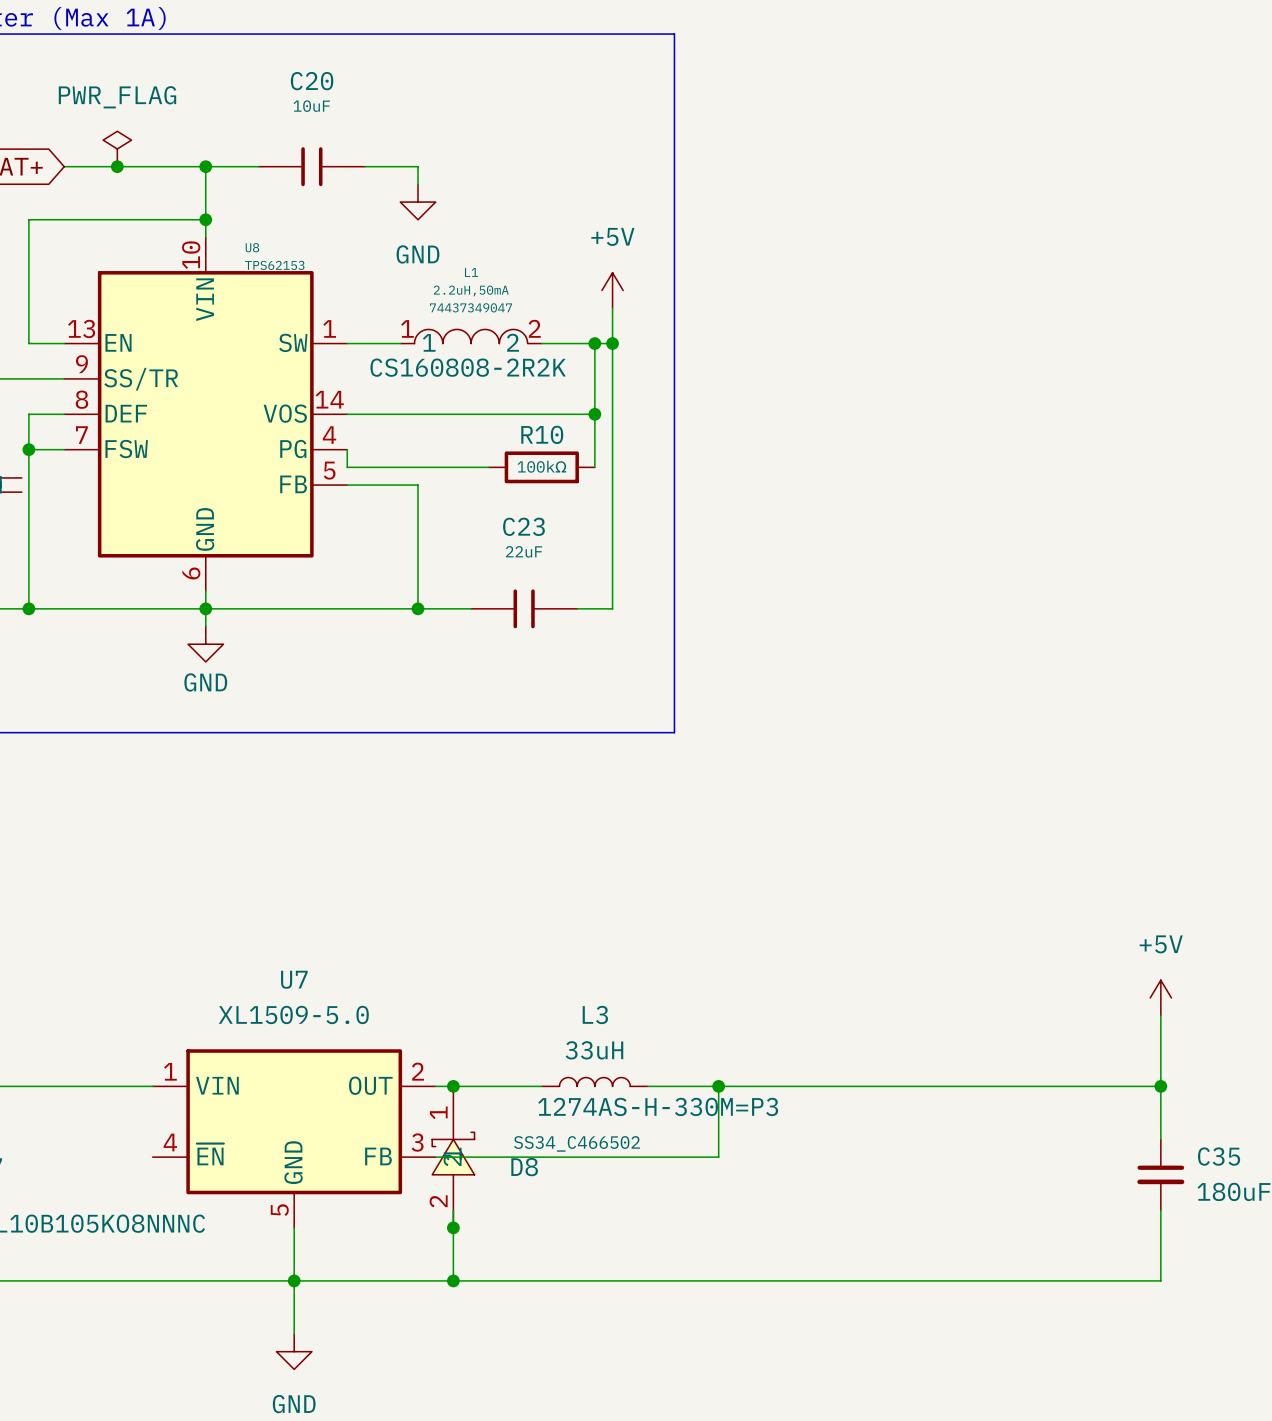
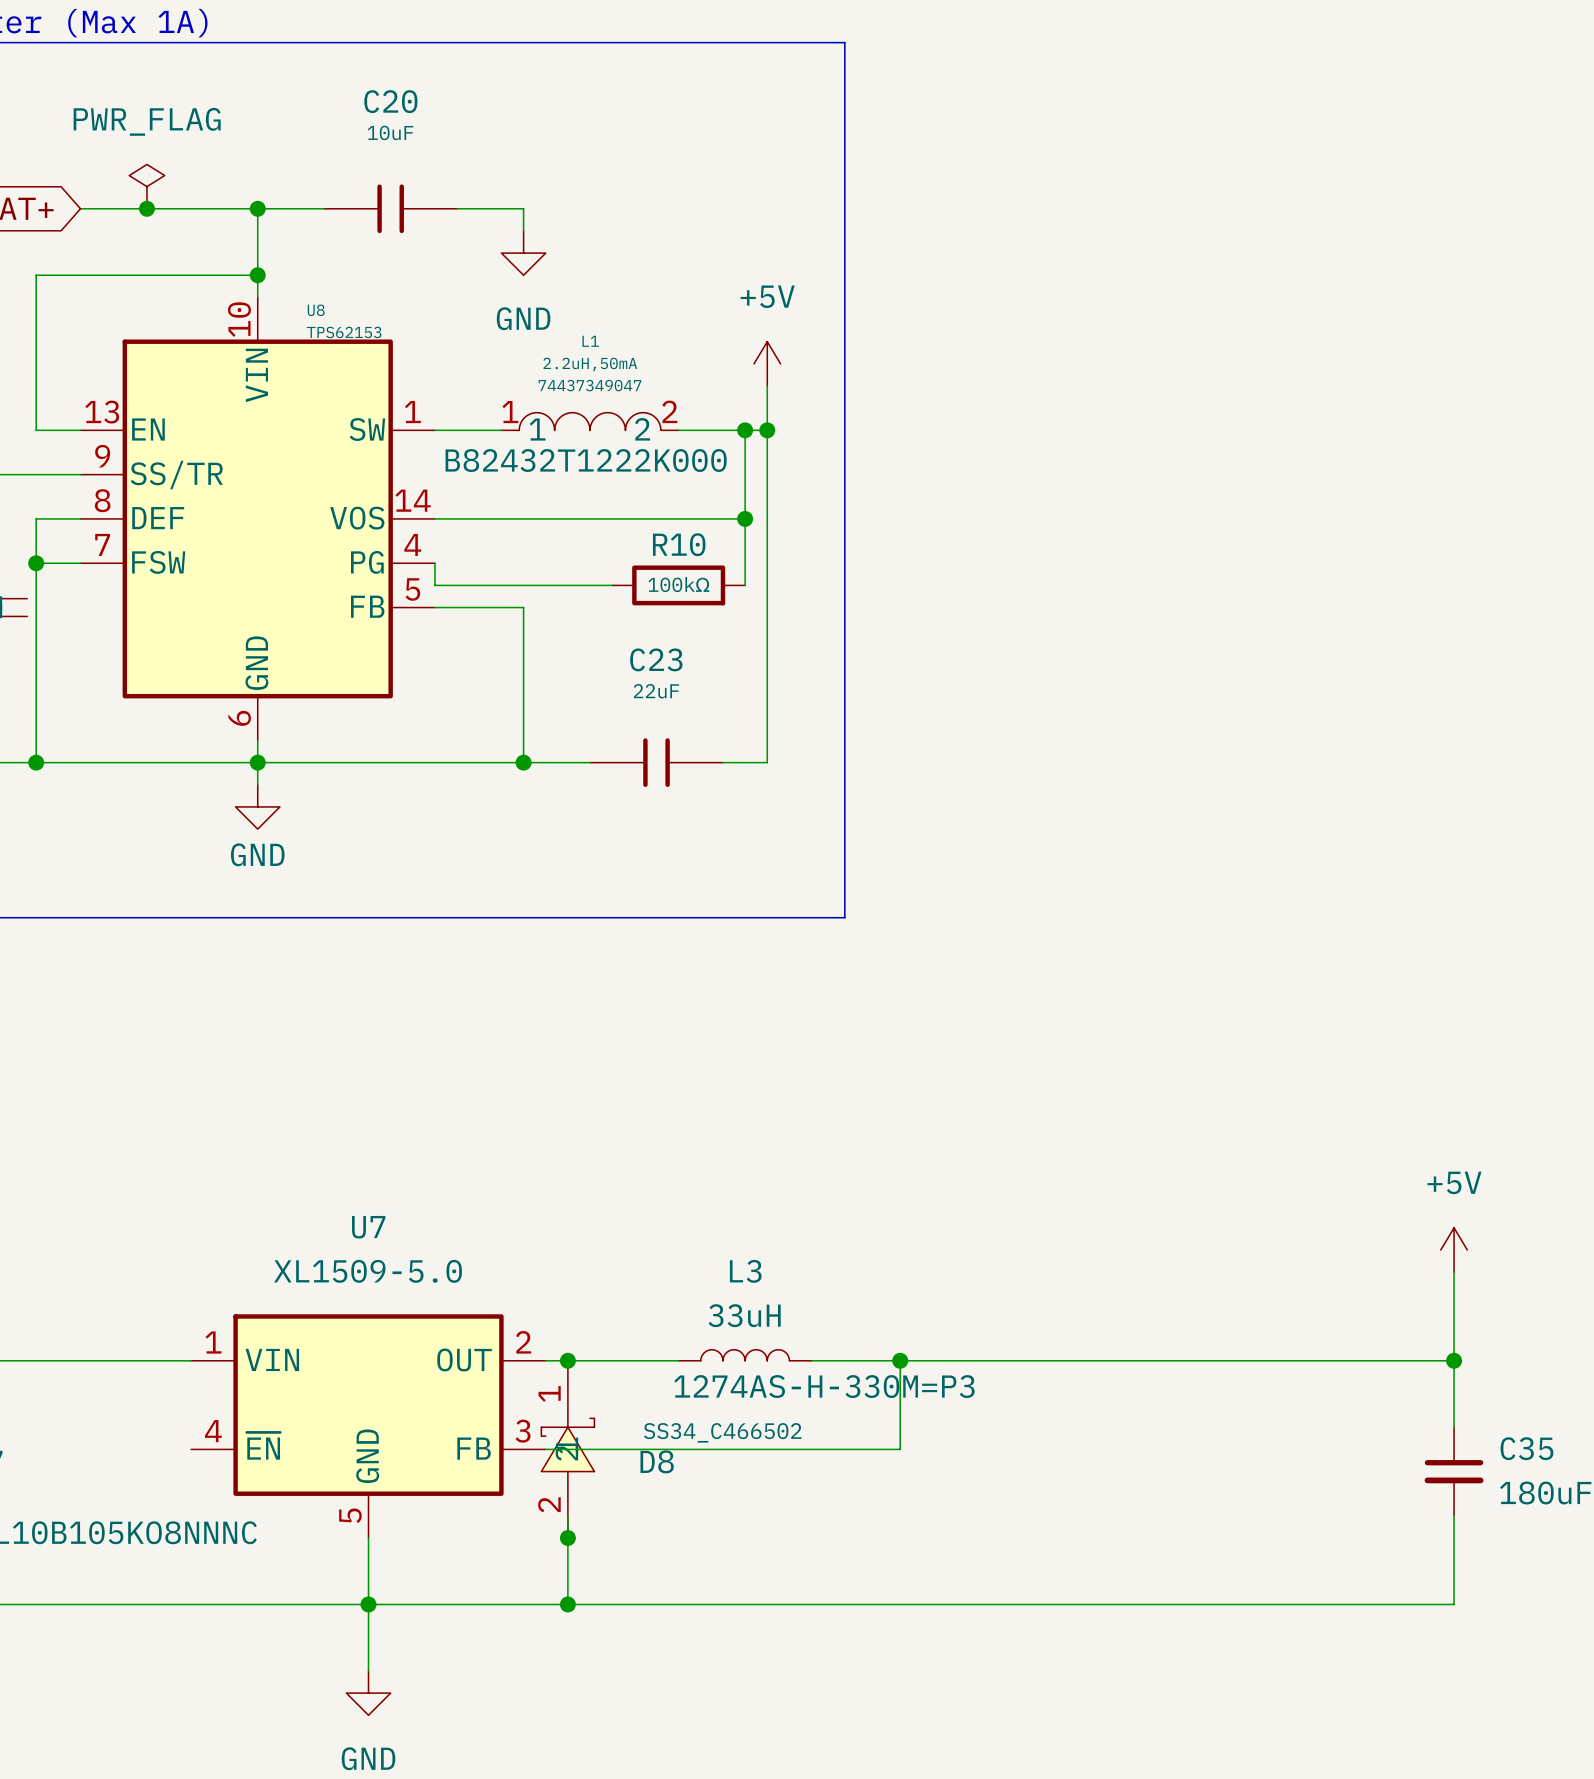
L1 text: CS160808-2R2K (468, 367) -> B82432T1222K000 (586, 460)

